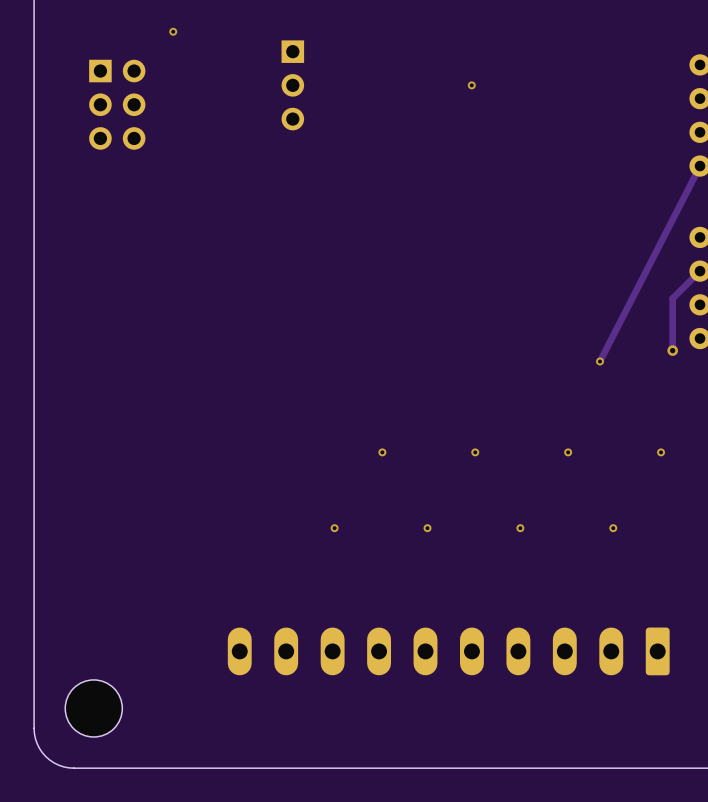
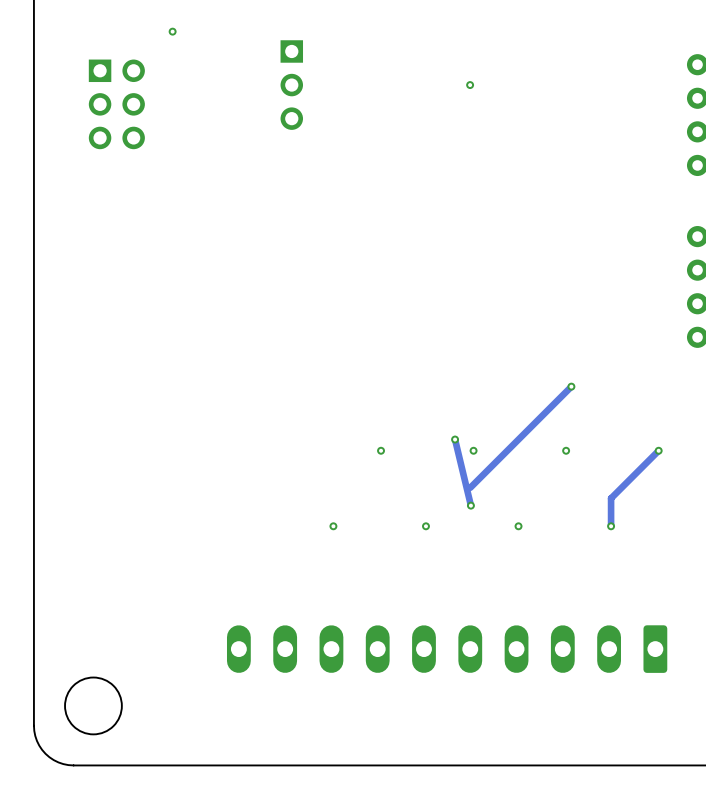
track: (695, 175) (599, 361) -> none
track: (700, 271) (672, 298) (672, 350) -> none
via: (672, 350) -> none
via position: (599, 361) -> (571, 386)
track: none -> (571, 386) (470, 487)
track: none -> (455, 439) (470, 505)
via: none -> (455, 439)
track: none -> (658, 450) (611, 498) (611, 526)
via: none -> (470, 505)

